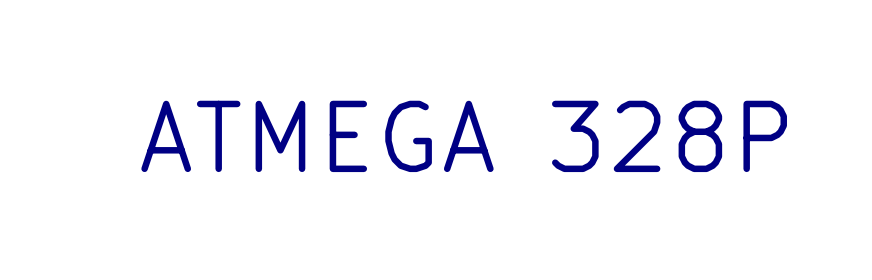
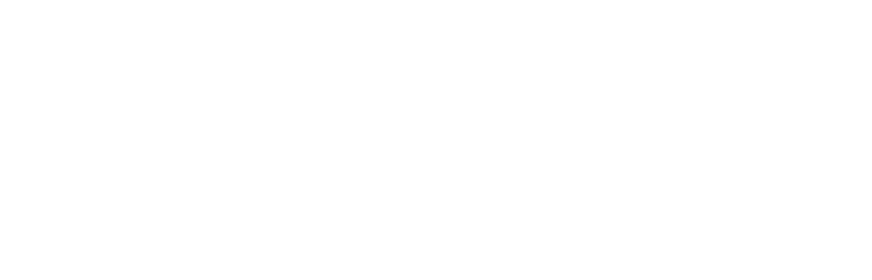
text: ATMEGA 328P (464, 136) -> none

